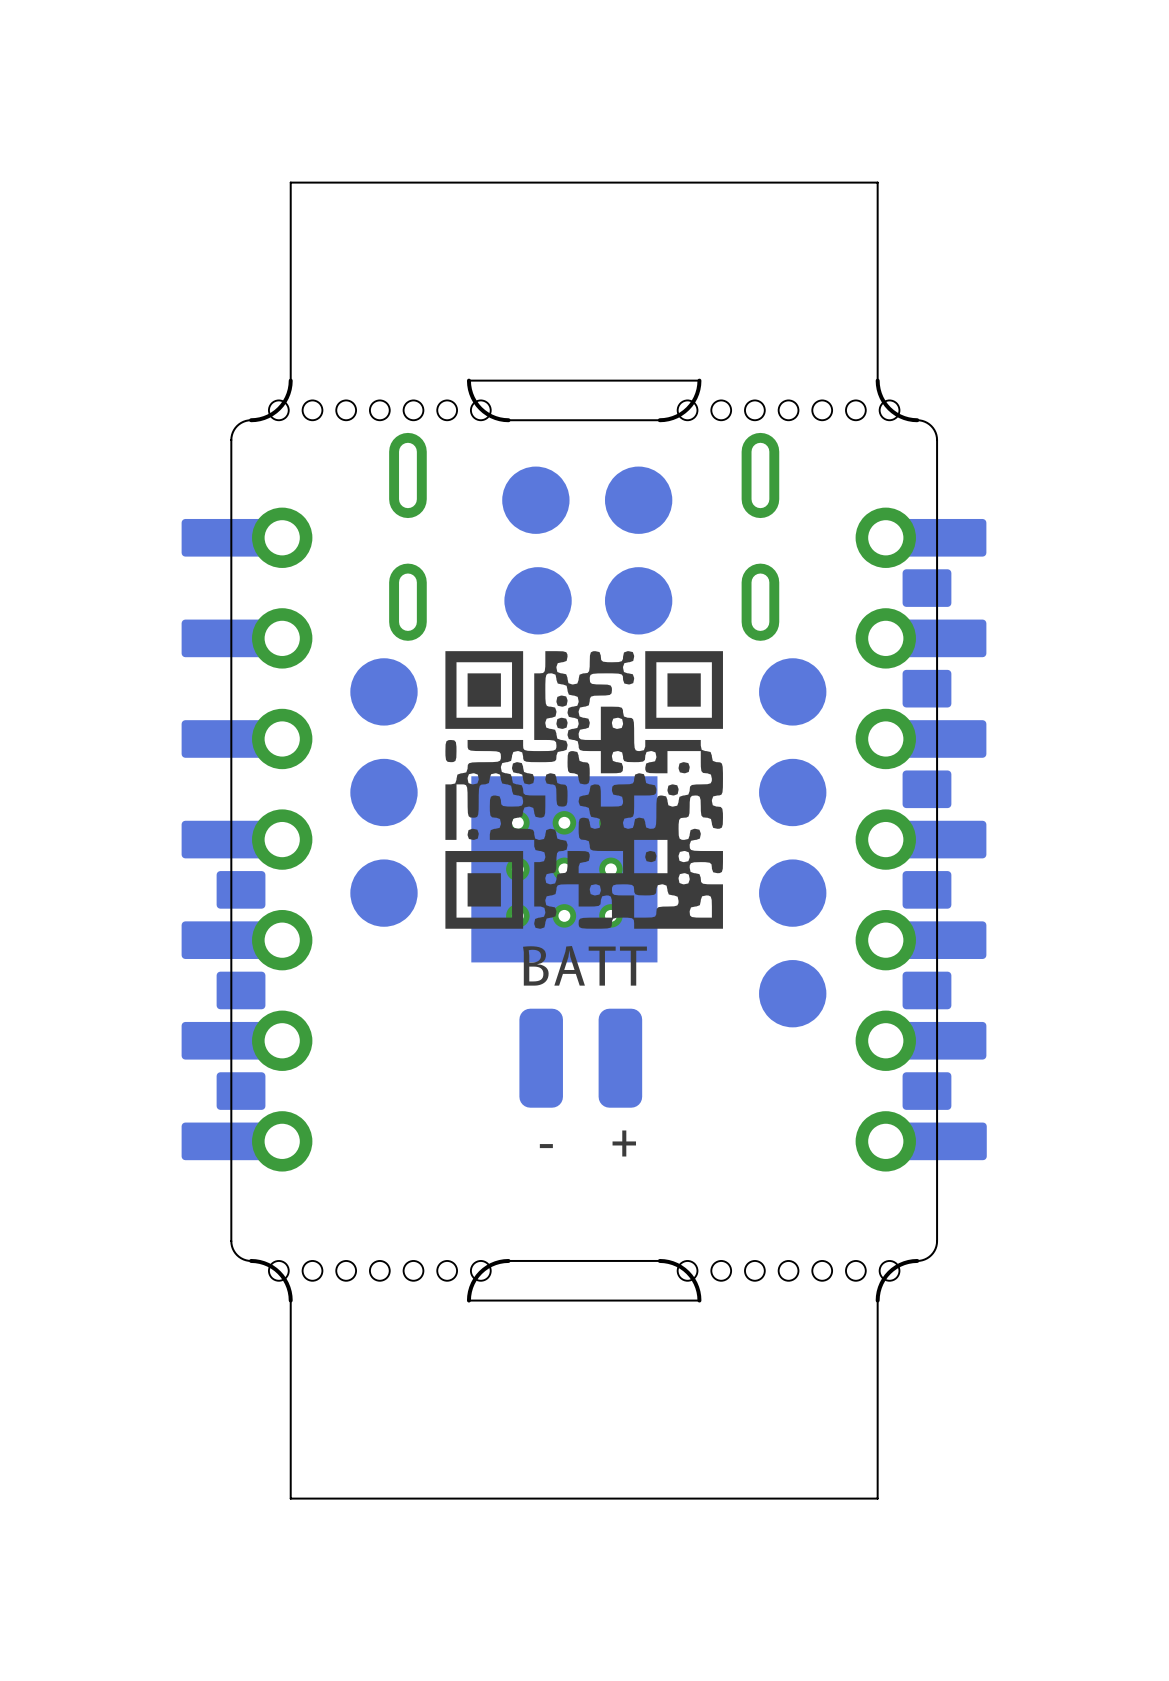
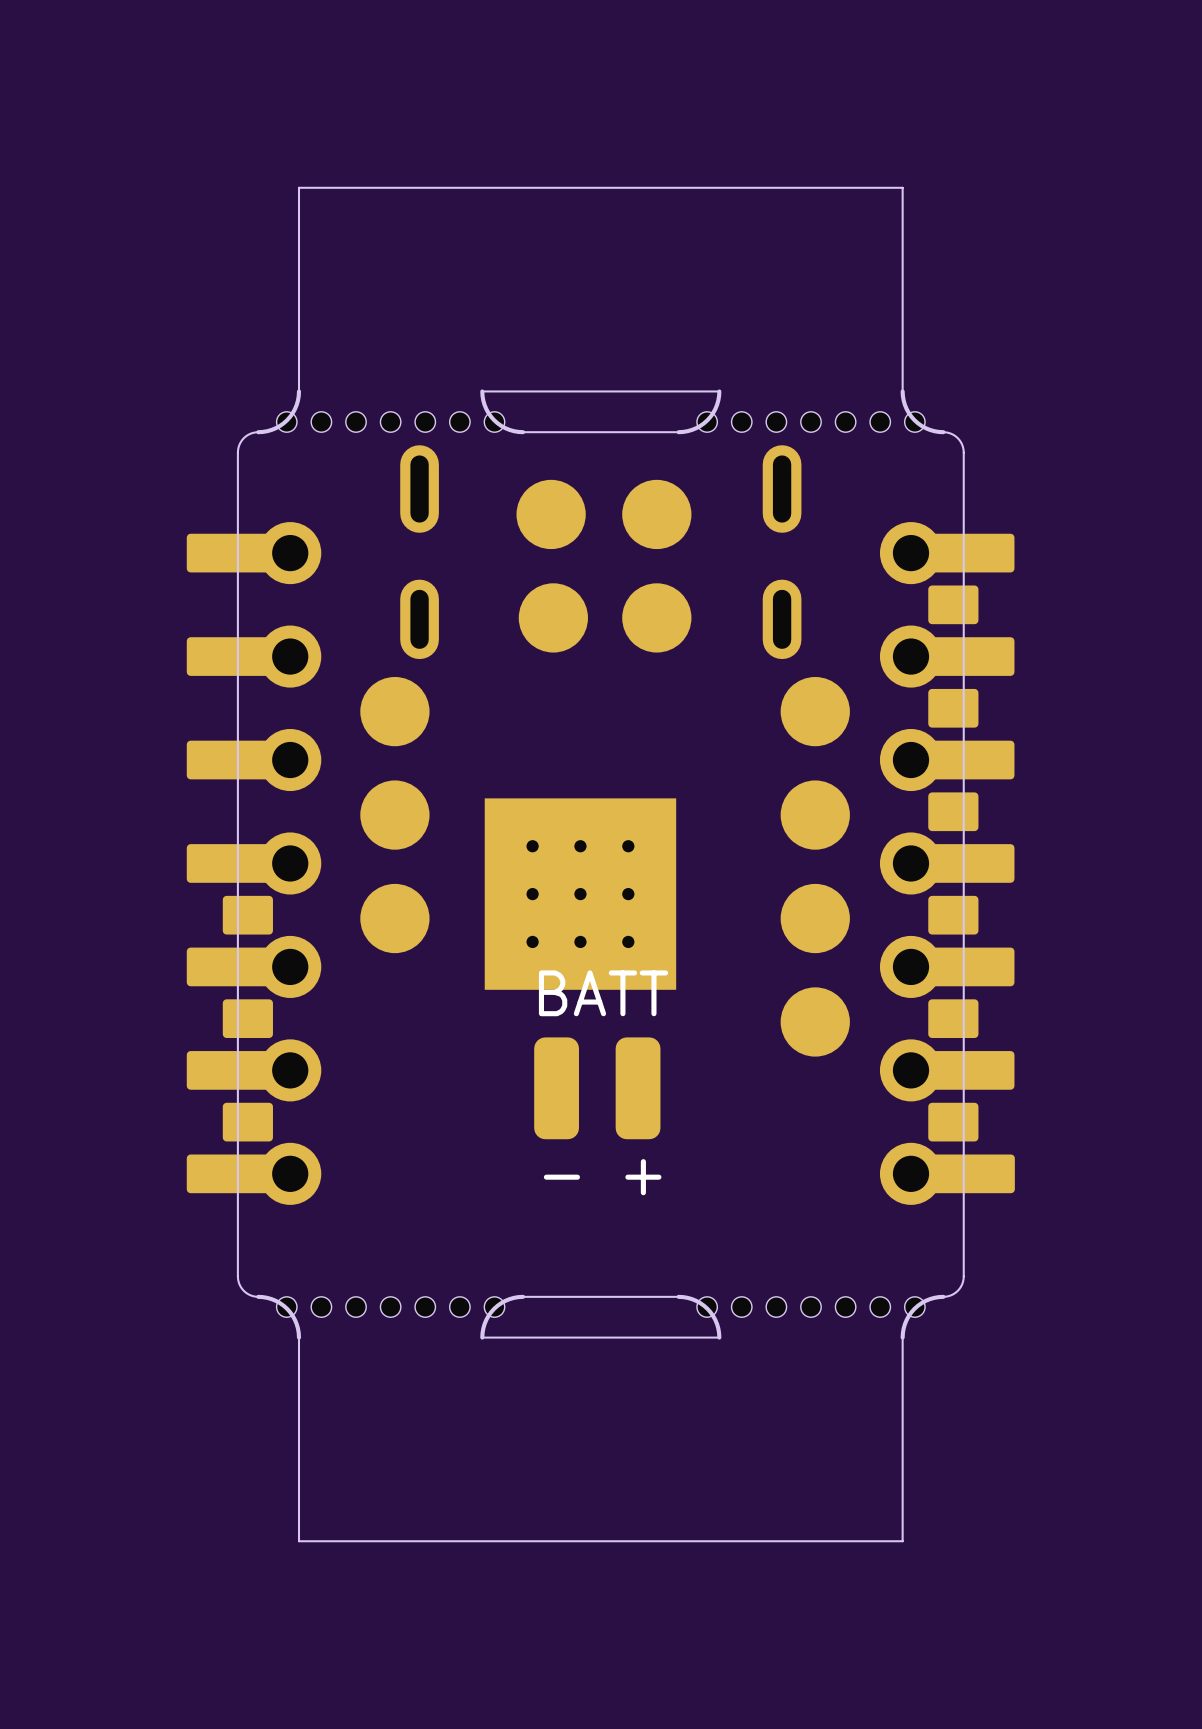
drawing: [445, 651, 723, 929] -> none

